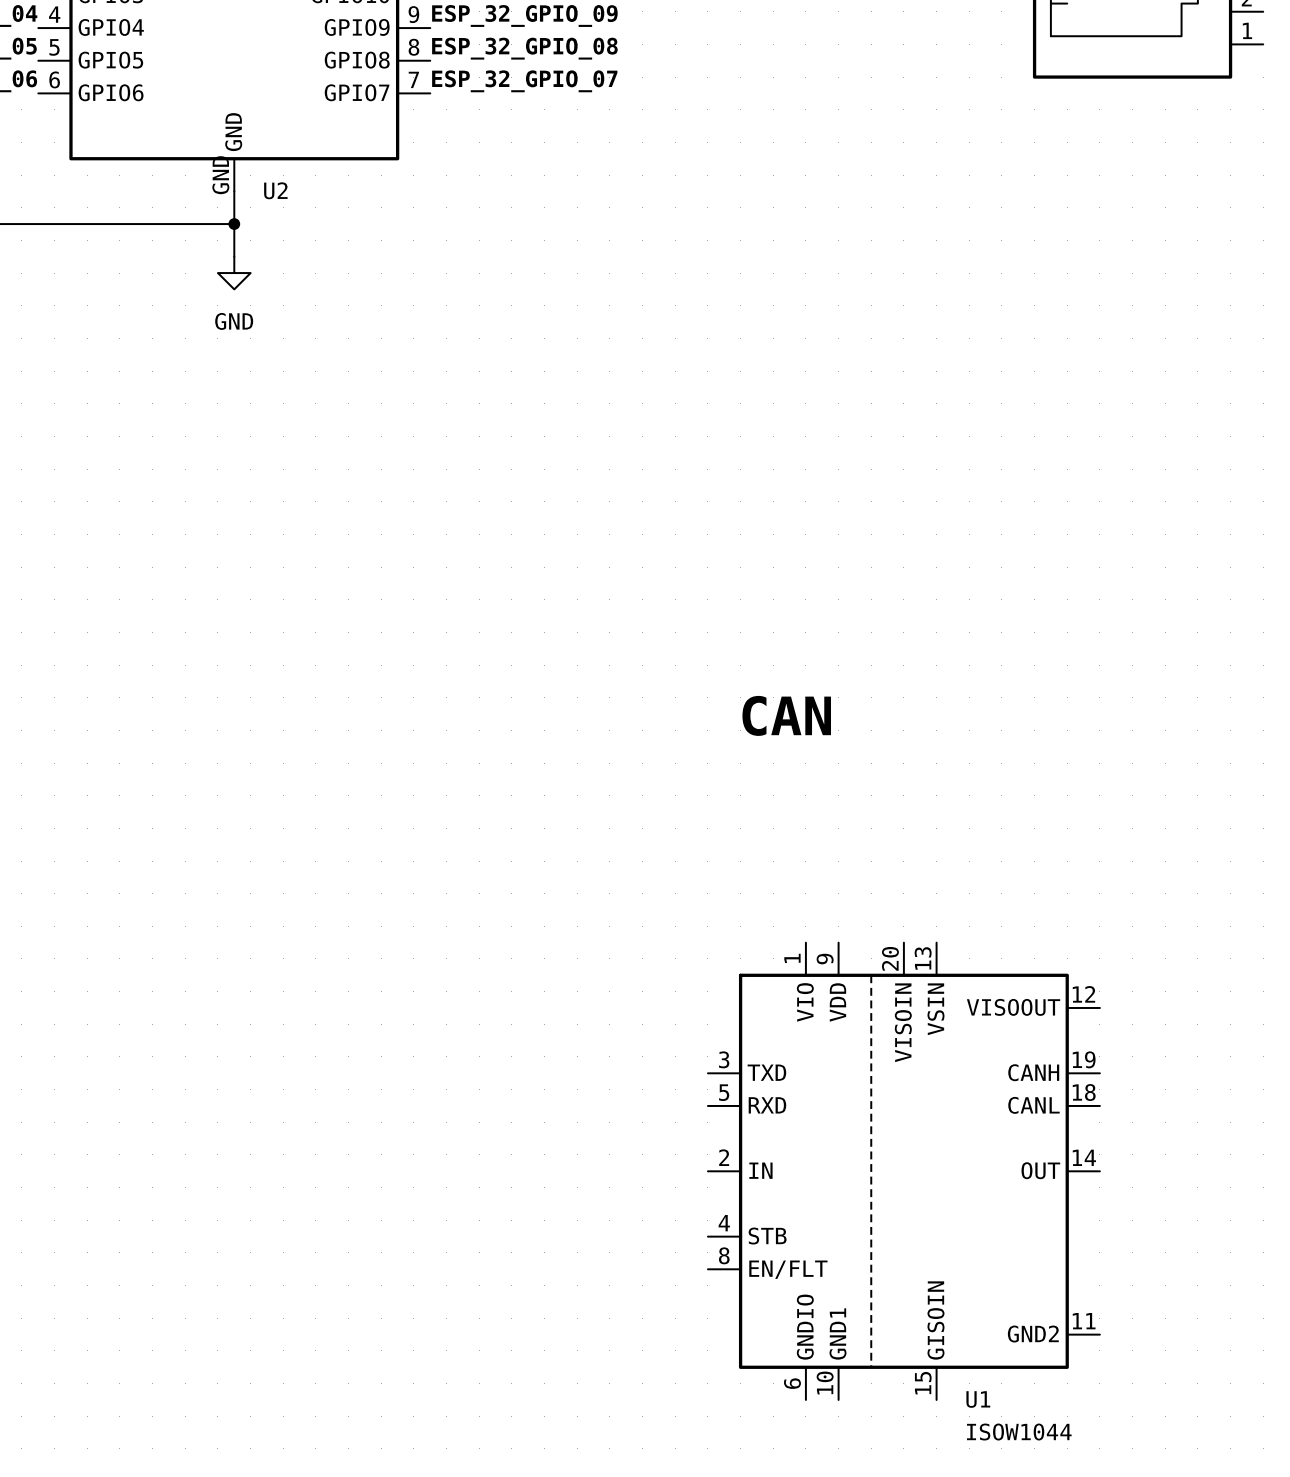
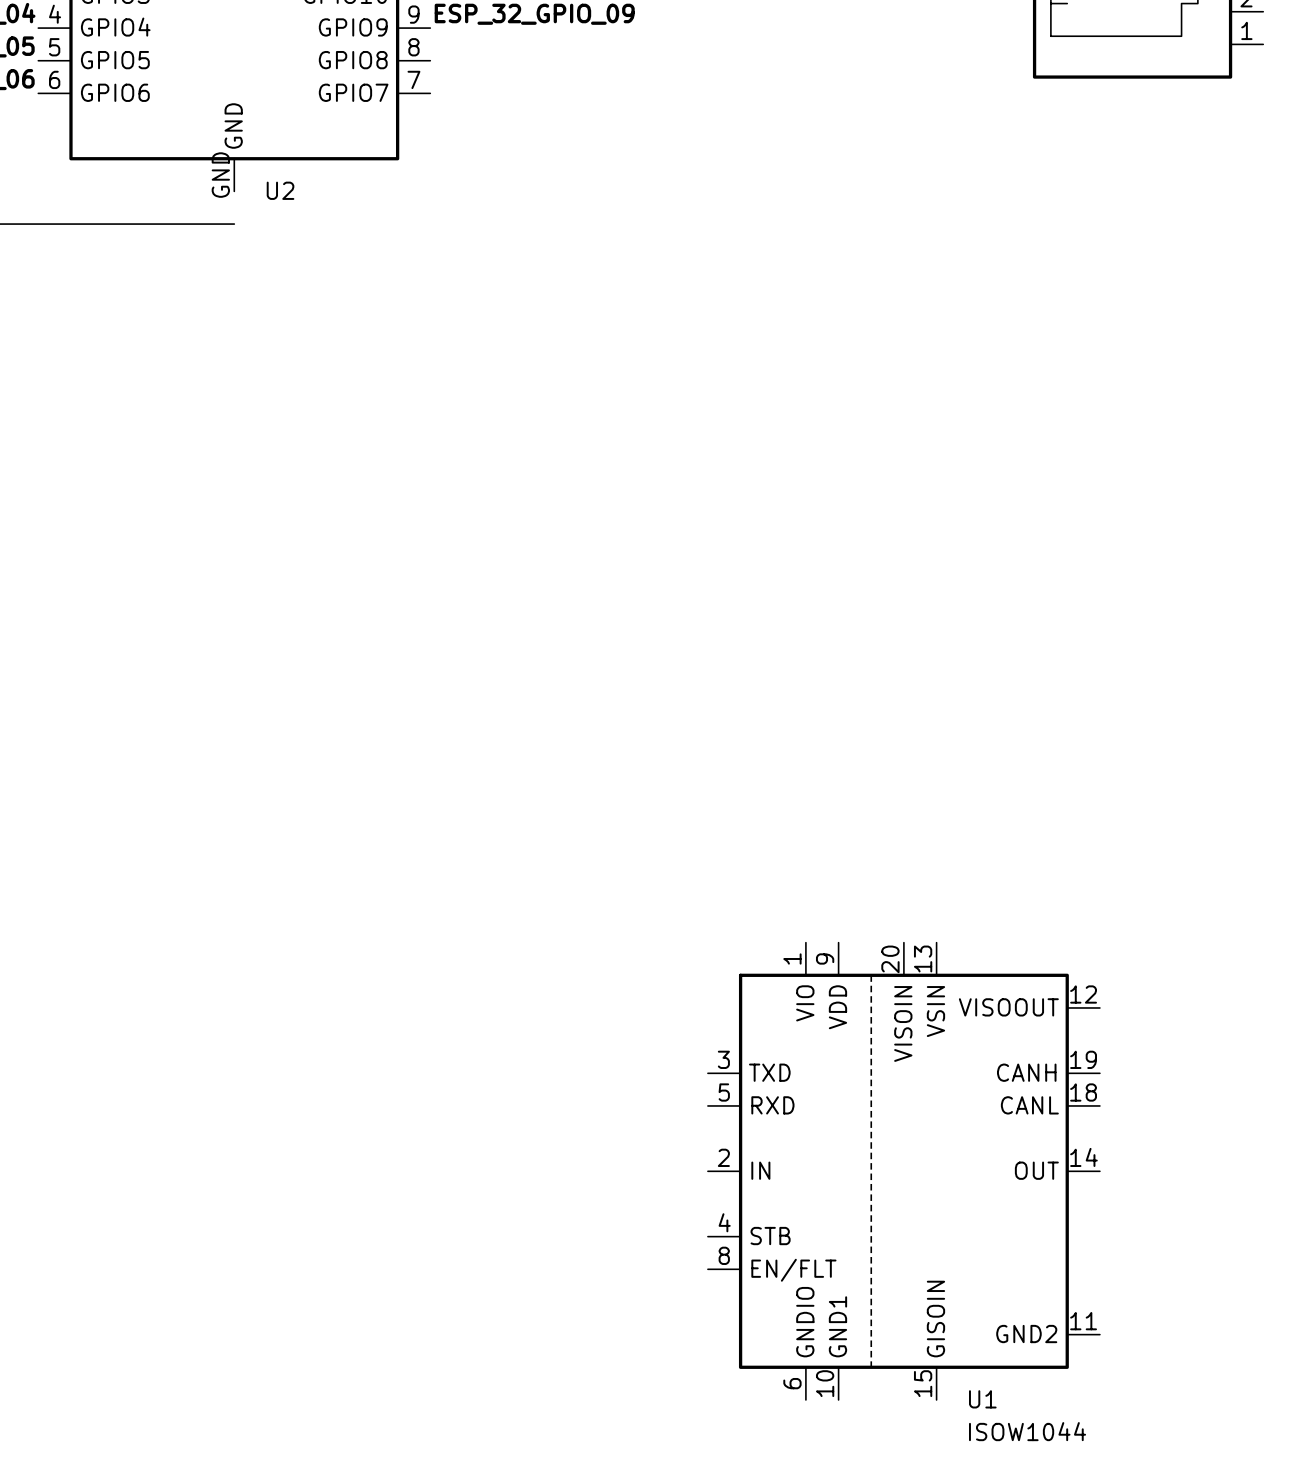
label: ESP_32_GPIO_08 (524, 48) -> none
label: ESP_32_GPIO_07 (524, 81) -> none
wire: (234, 191) (234, 256) -> none
junction: (234, 224) -> none
power symbol: GND (234, 273) -> none
text: CAN (786, 715) -> none

